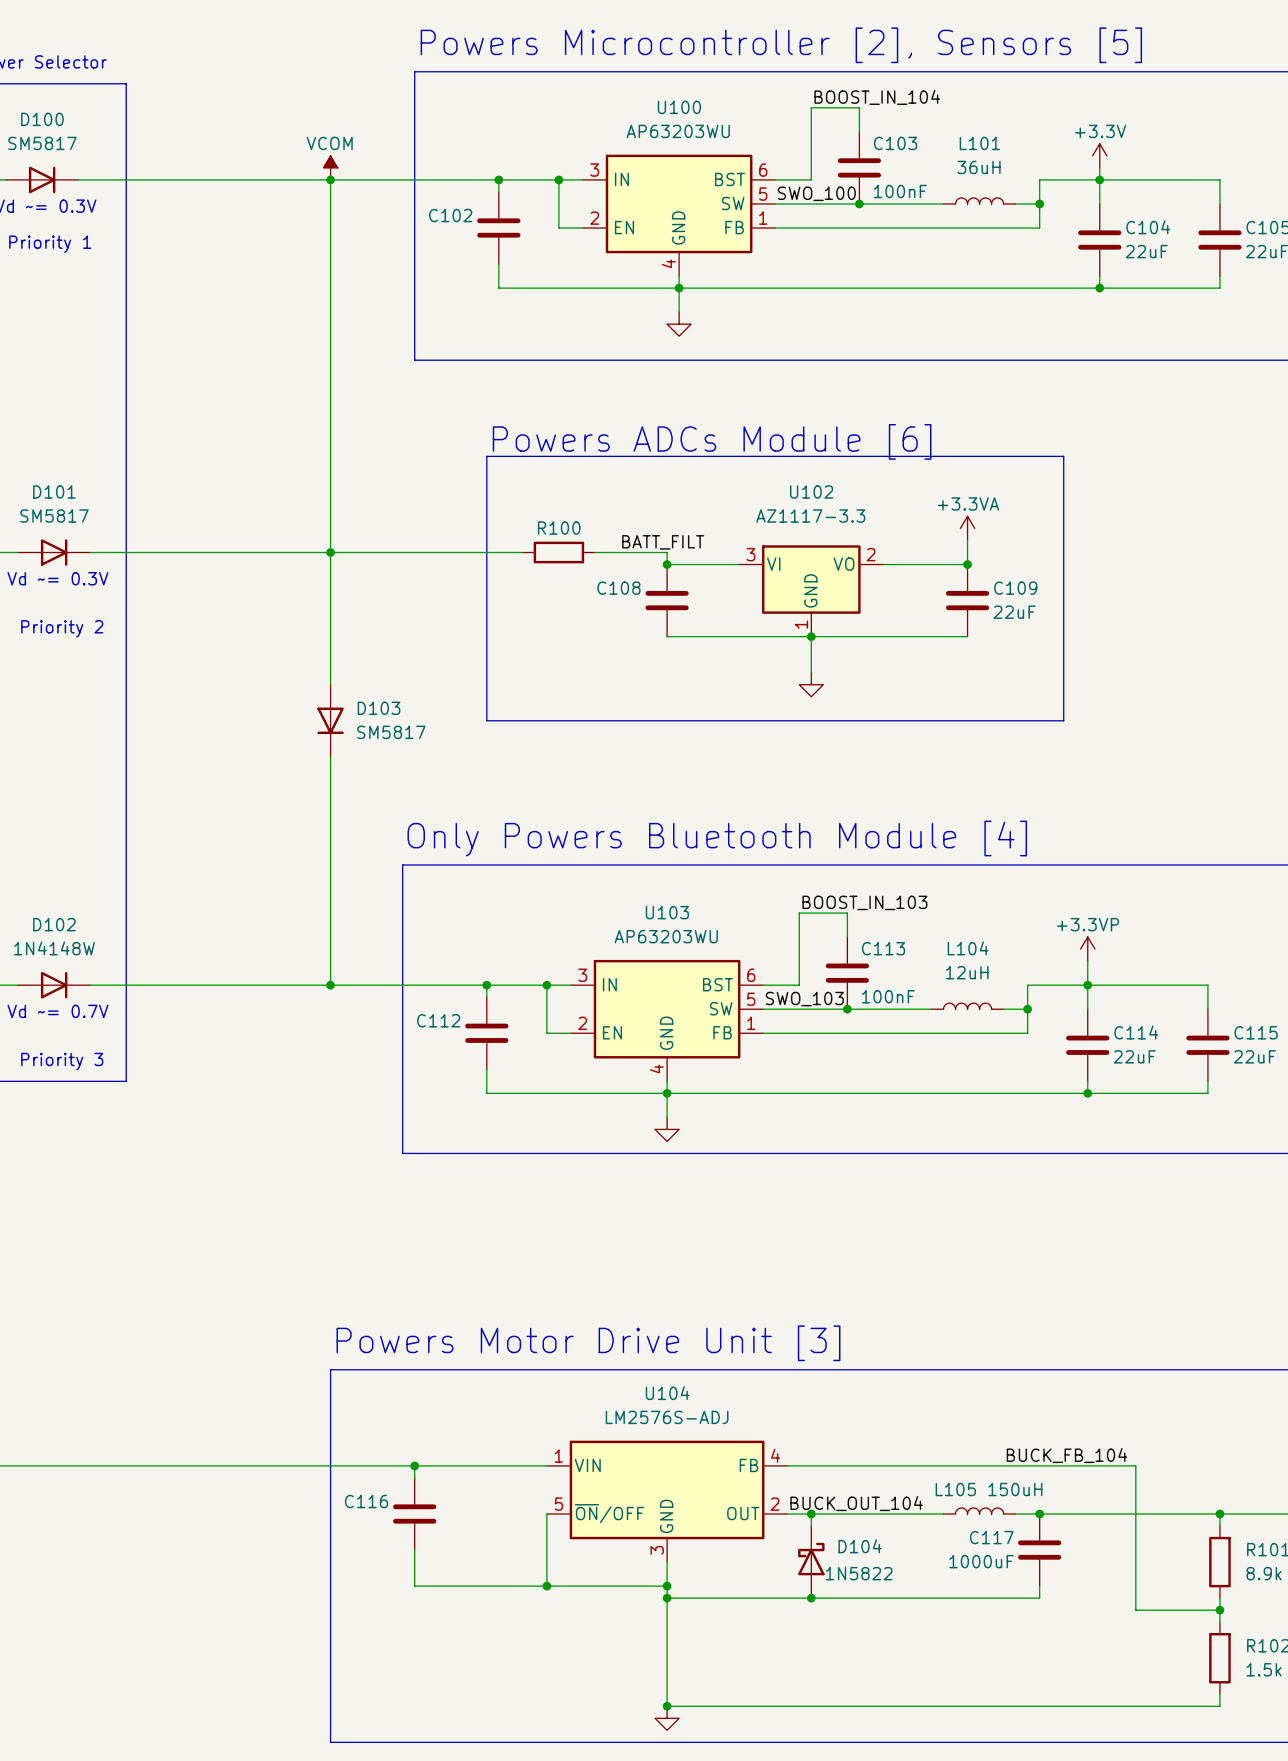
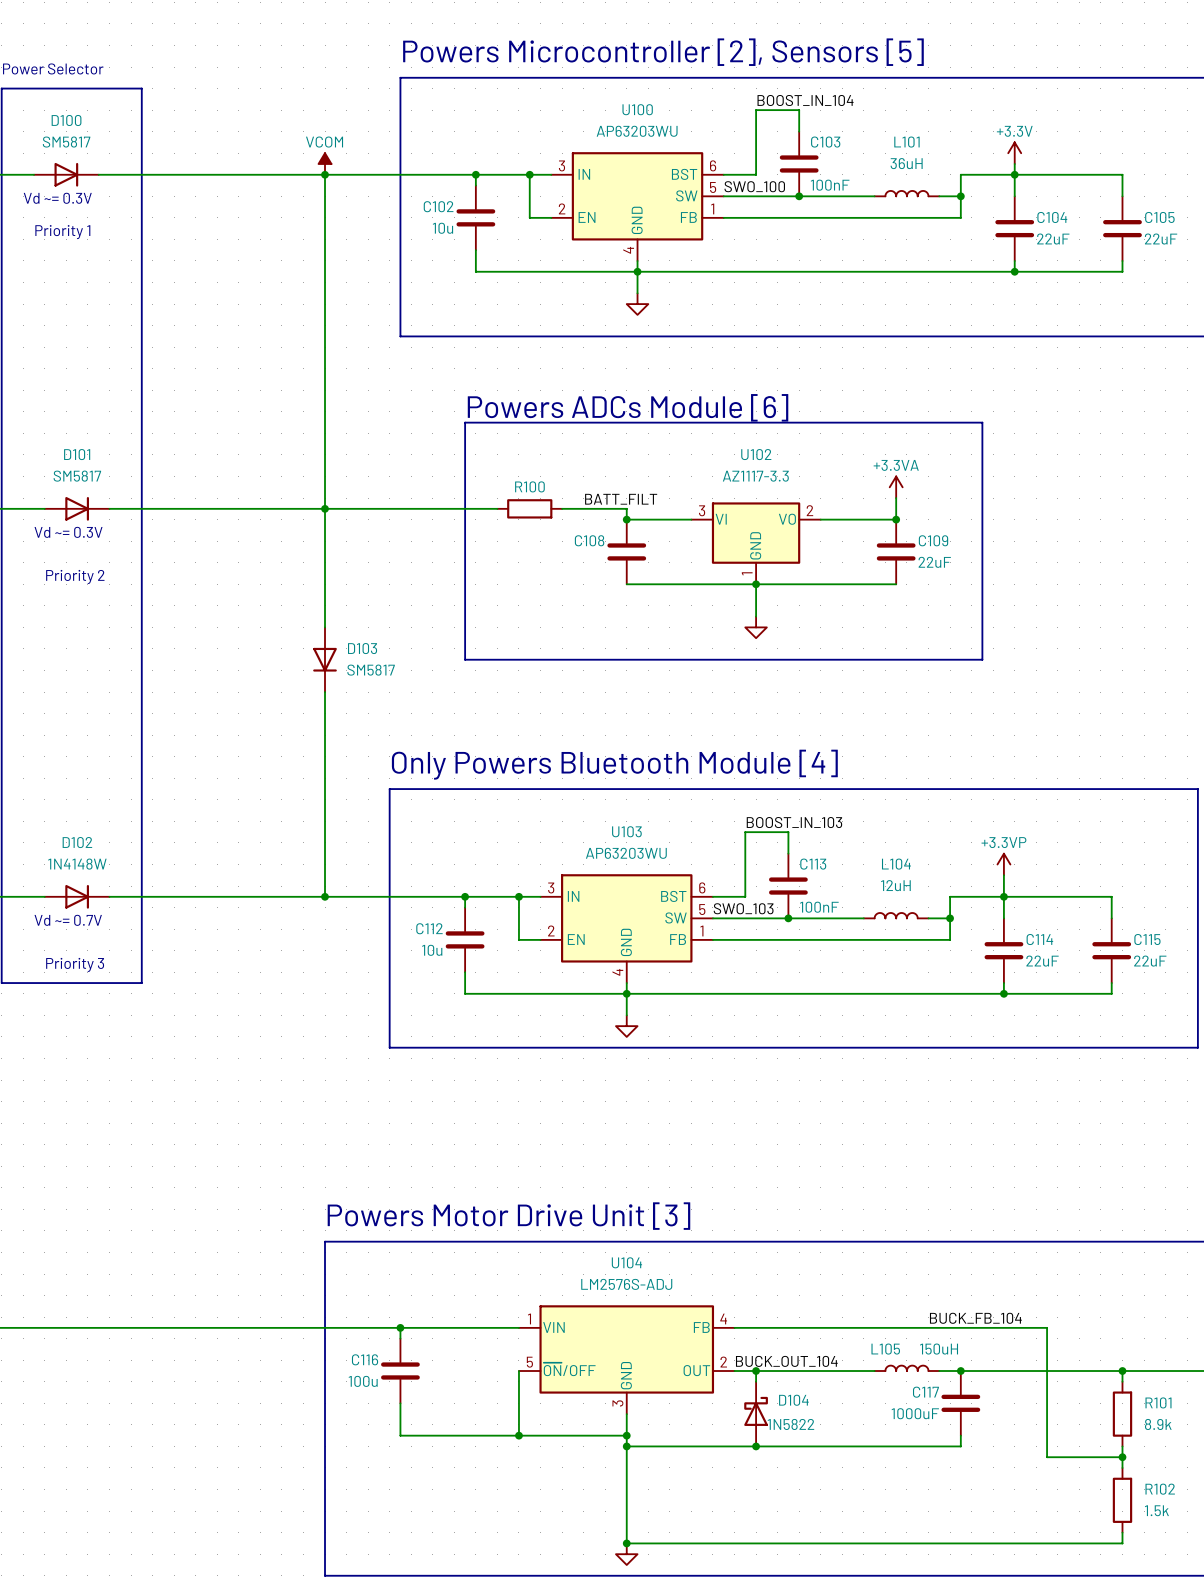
C102 value: none -> 10u (442, 228)
C112 value: none -> 10u (432, 950)
C116 value: none -> 100u (363, 1381)

